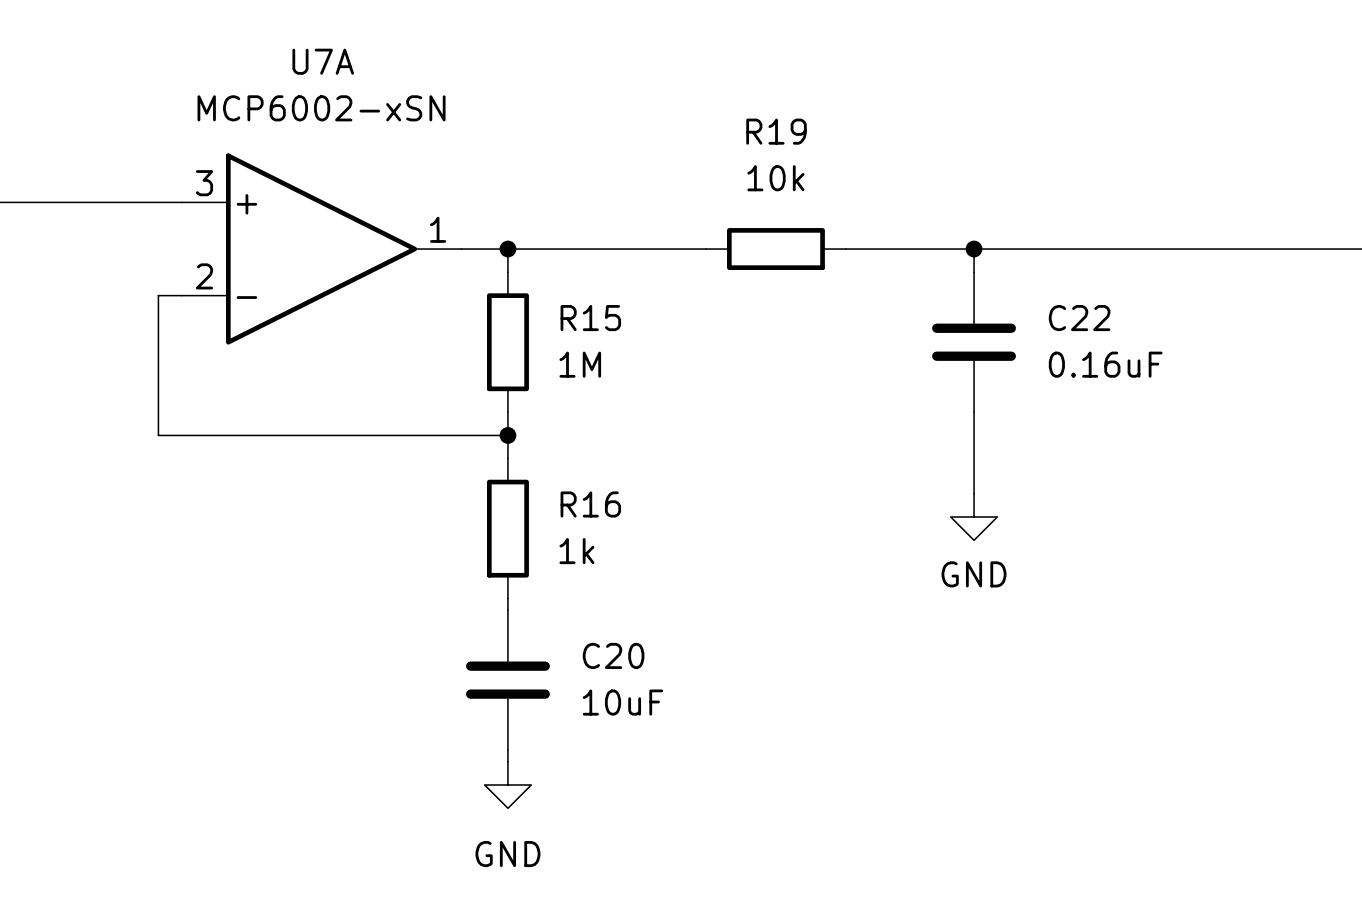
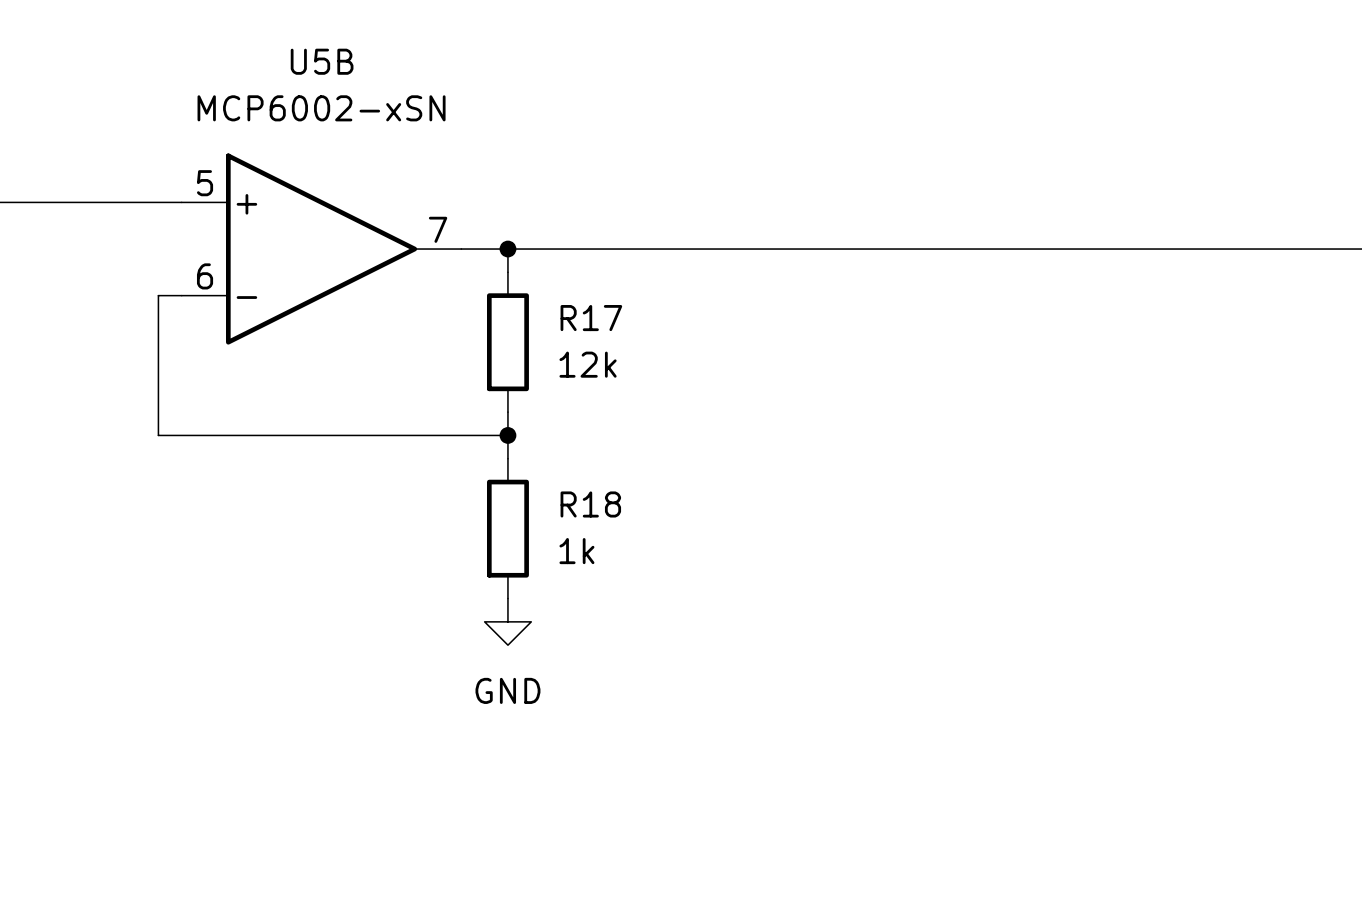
U7A name: U7A (323, 61) -> U5B (322, 61)
U7A pin number: 3 (204, 183) -> 5 (205, 183)
U7A pin number: 1 (438, 229) -> 7 (438, 229)
wire: none -> (706, 249) (845, 249)
R19: 10k (775, 249) -> none
wire: (974, 249) (974, 272) -> none
junction: (974, 249) -> none
U7A pin number: 2 (204, 276) -> 6 (205, 276)
R15 name: R15 (590, 318) -> R17 (591, 318)
C22: 0.16uF (974, 342) -> none
R15 value: 1M (580, 364) -> 12k (588, 364)
wire: (974, 412) (974, 493) -> none
R16 name: R16 (590, 504) -> R18 (590, 504)
power symbol: GND (974, 517) -> none
C20: 10uF (507, 680) -> none
wire: (507, 750) (507, 761) -> none
power symbol position: GND (507, 784) -> GND (507, 621)

